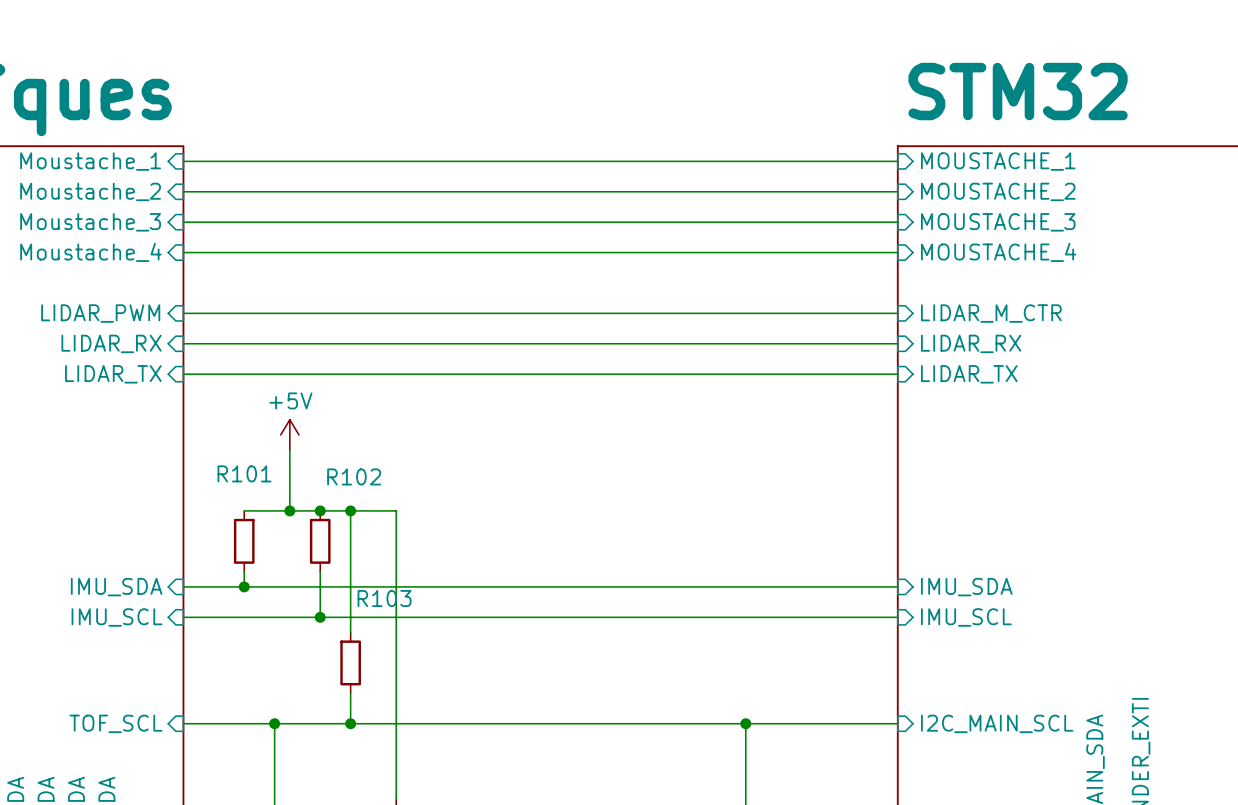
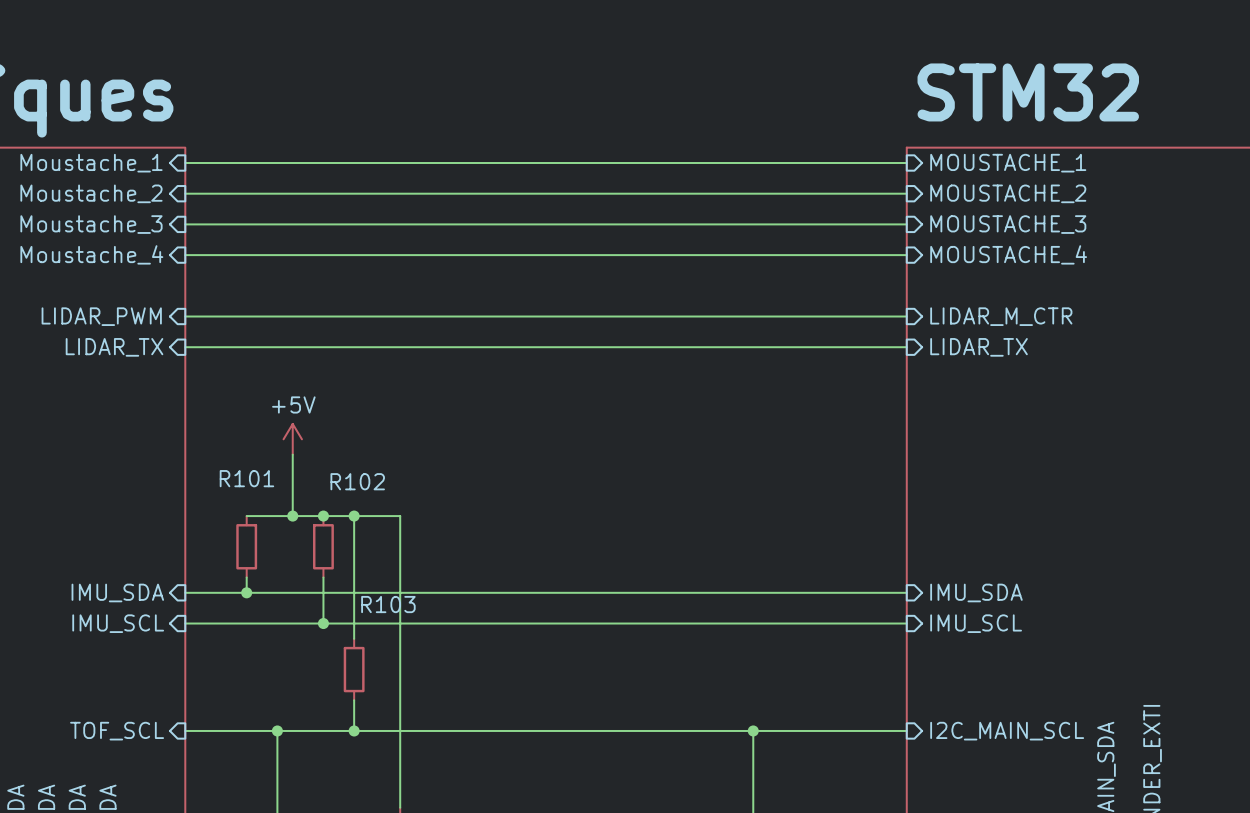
sheet pin: LIDAR_RX (111, 343) -> LIDAR_TX (114, 347)
sheet pin: LIDAR_RX (971, 343) -> LIDAR_TX (979, 347)
sheet pin: LIDAR_TX (113, 374) -> none
wire: (183, 374) (897, 374) -> none
sheet pin: LIDAR_TX (969, 374) -> none

